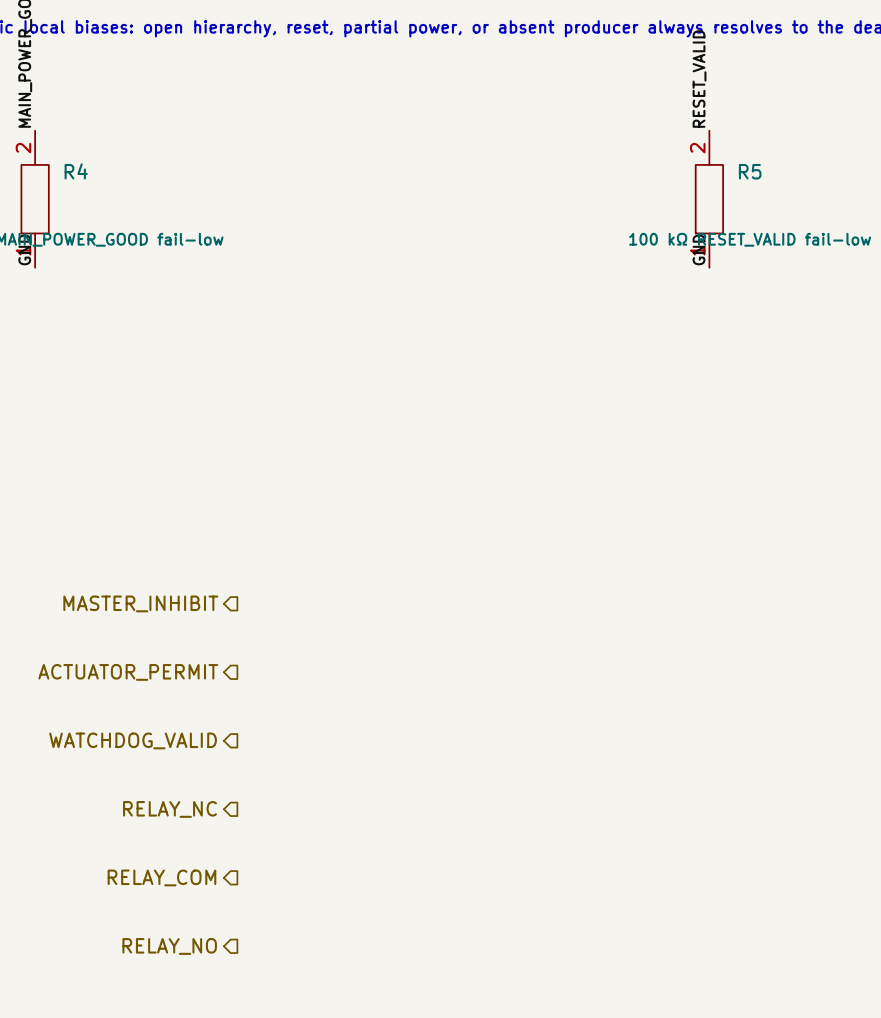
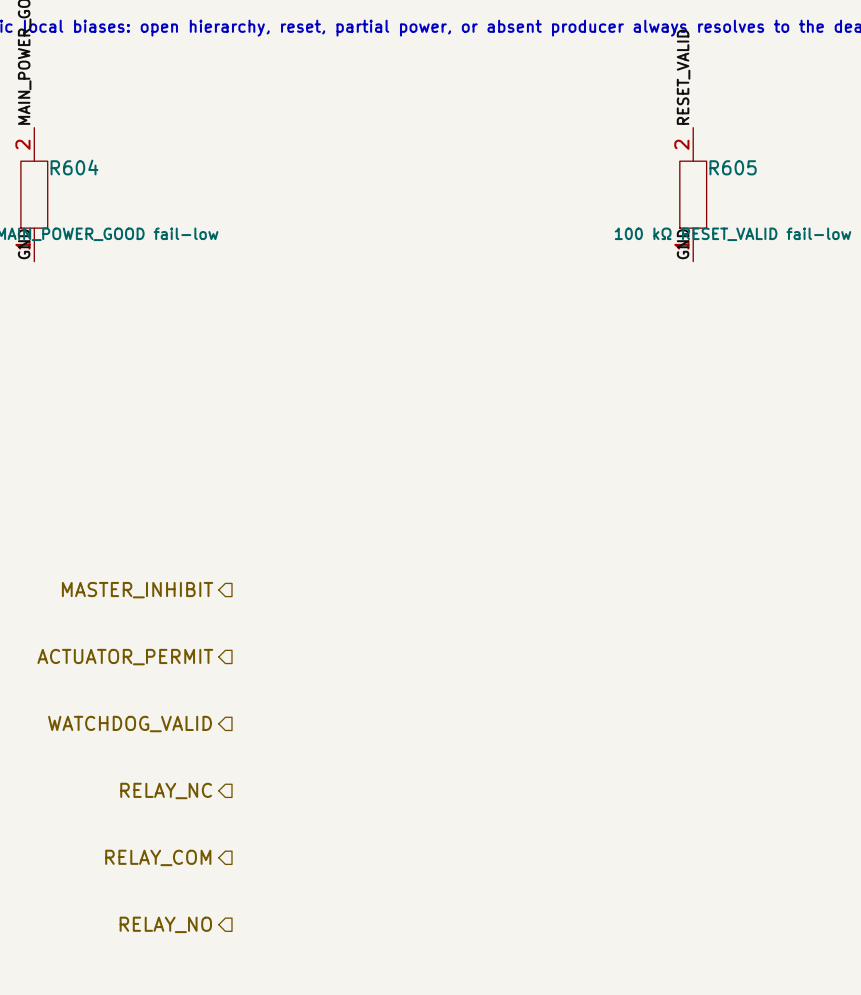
R4 name: R4 (76, 171) -> R604 (74, 167)
R5 name: R5 (750, 171) -> R605 (733, 167)

